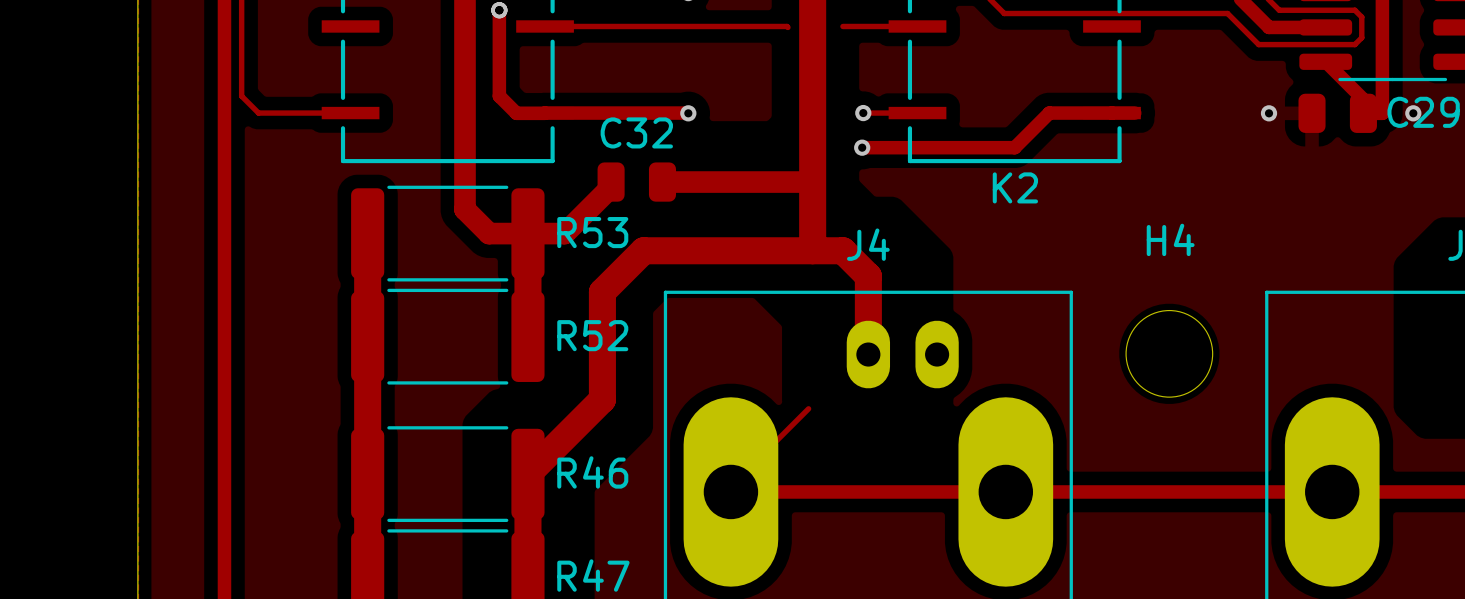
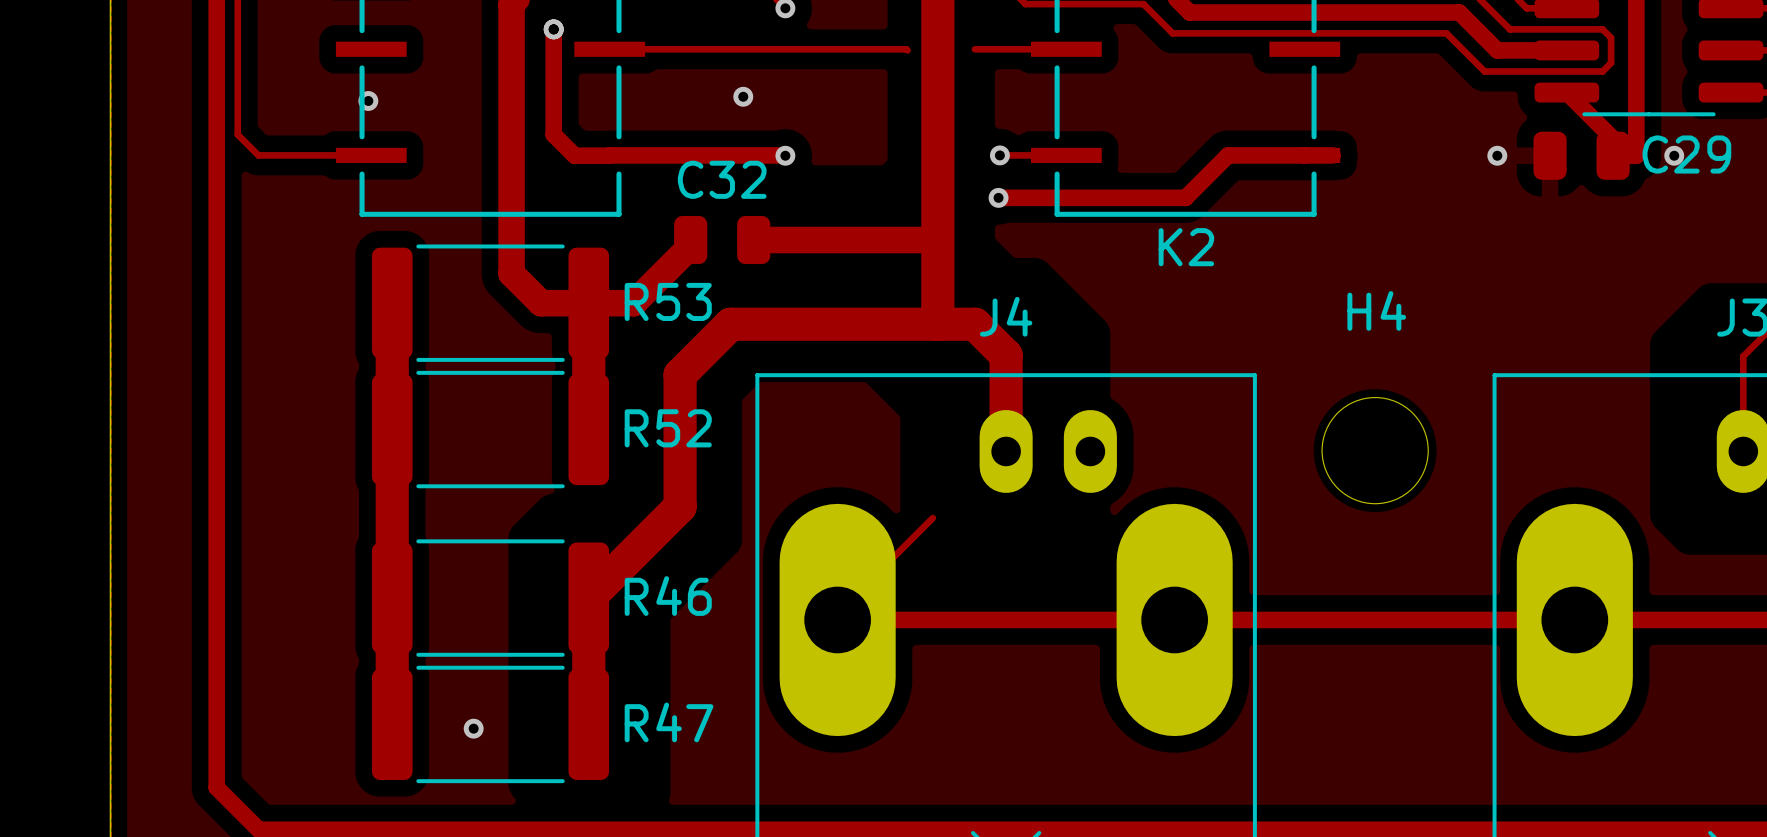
via: none -> (743, 96)
via: none -> (368, 100)
via: none -> (473, 728)

